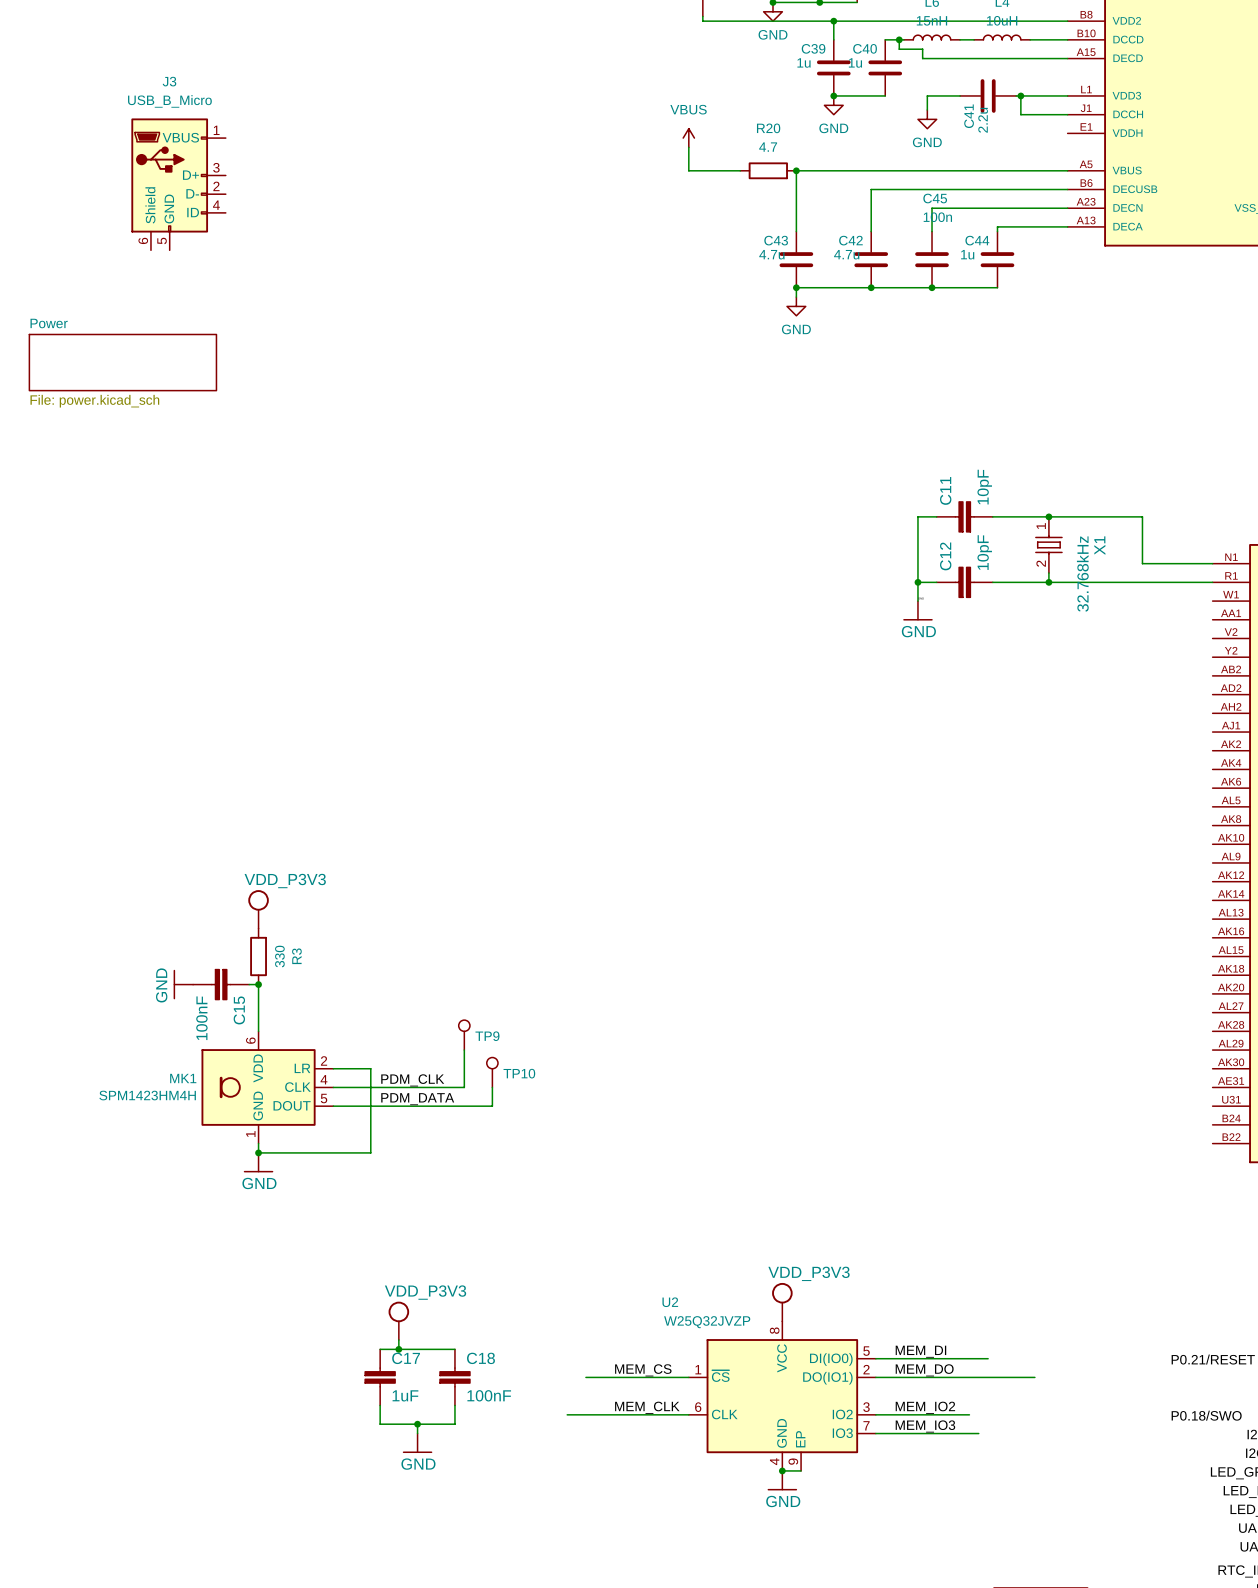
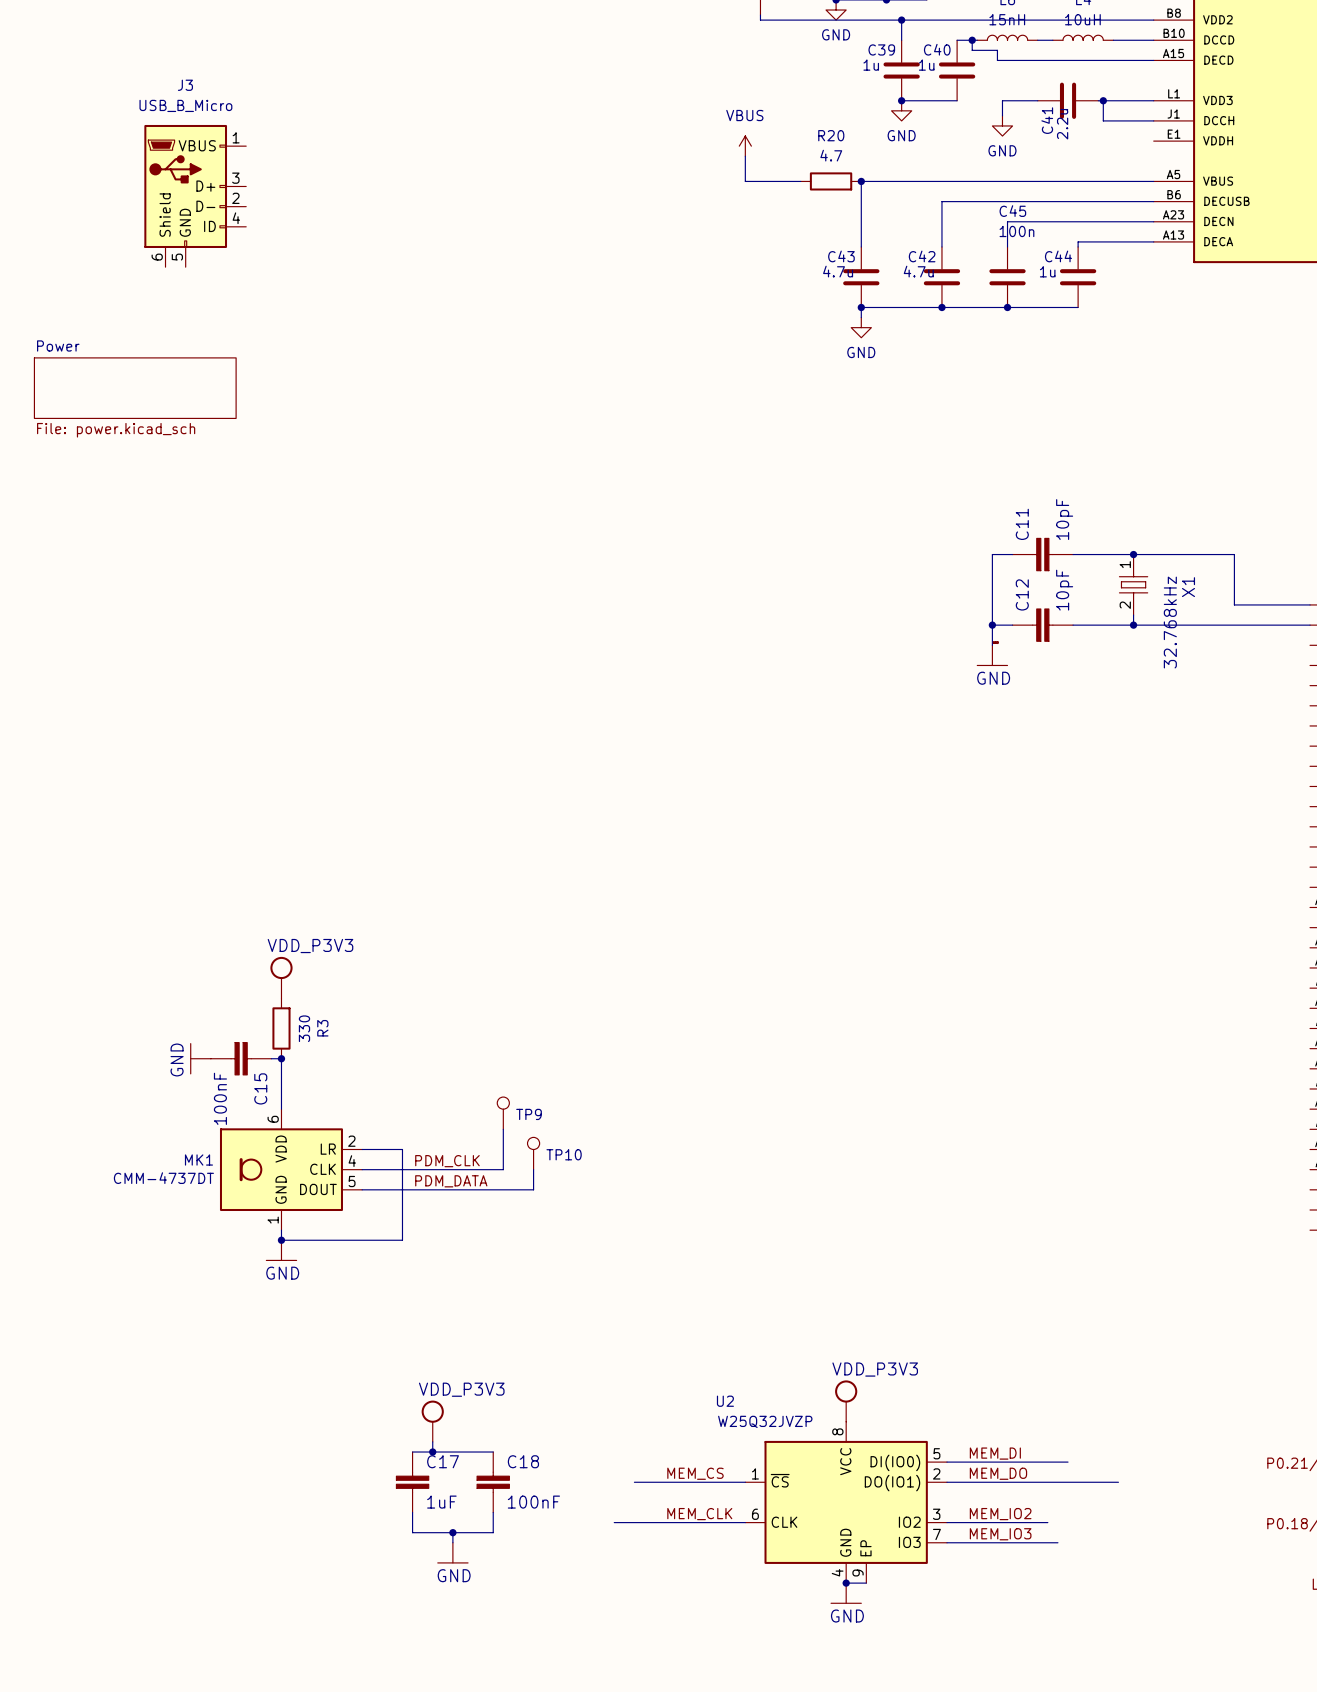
MK1 value: SPM1423HM4H (147, 1095) -> CMM-4737DT (163, 1178)

